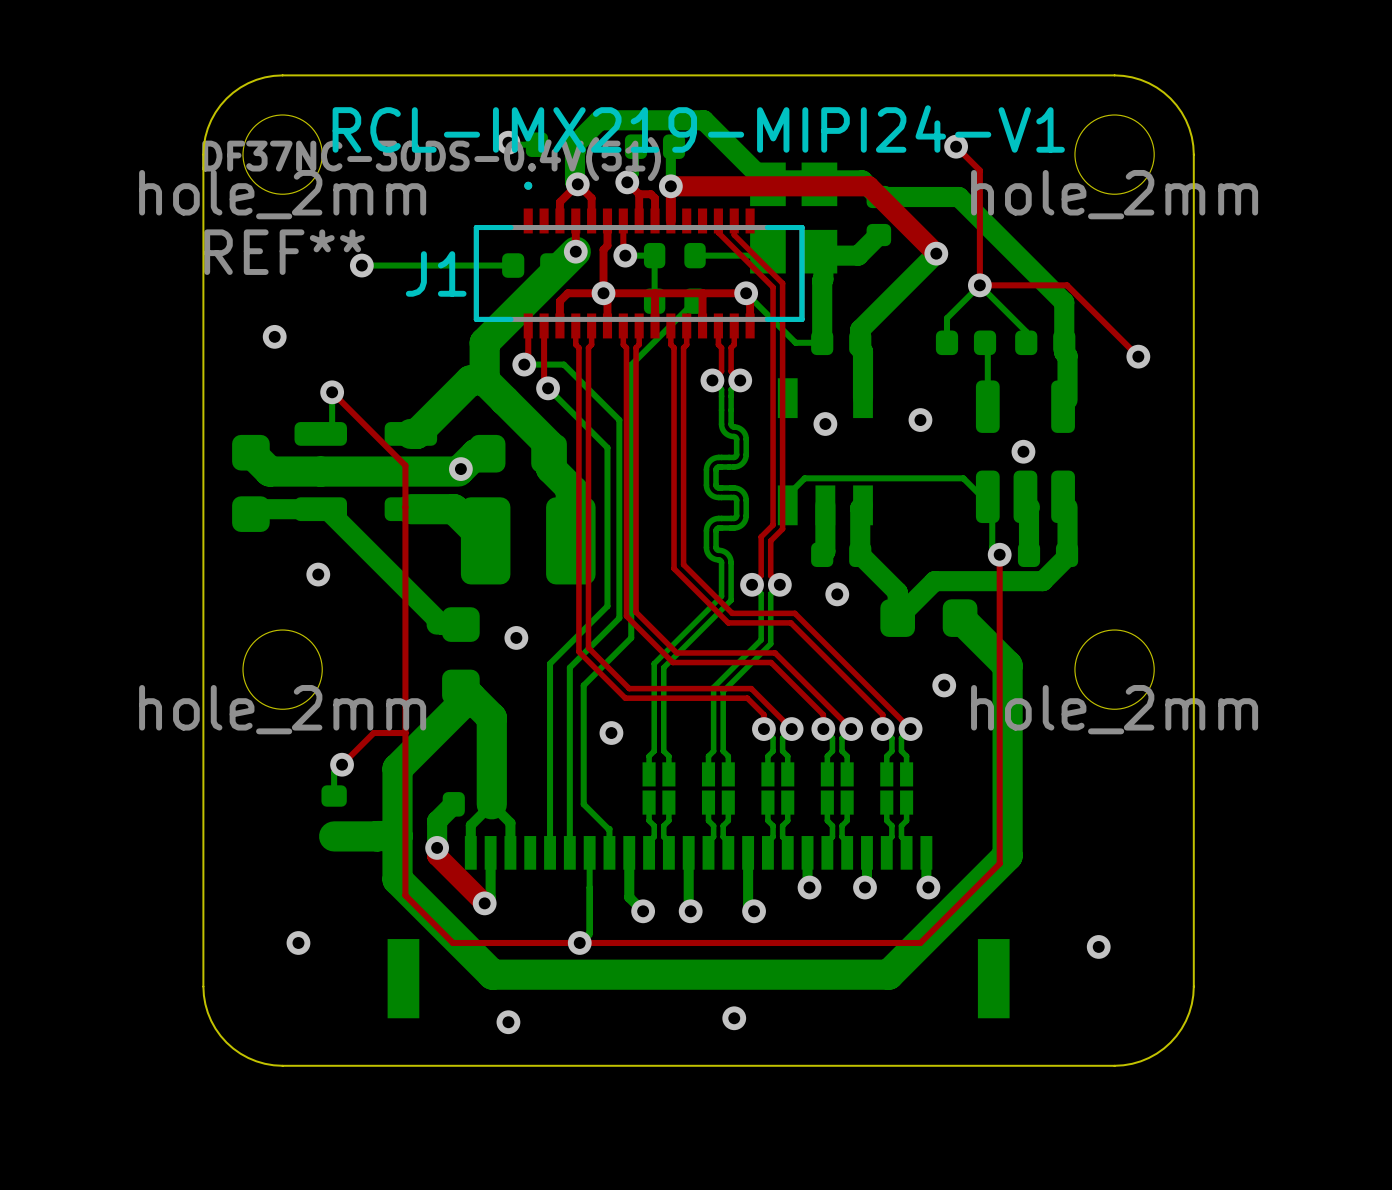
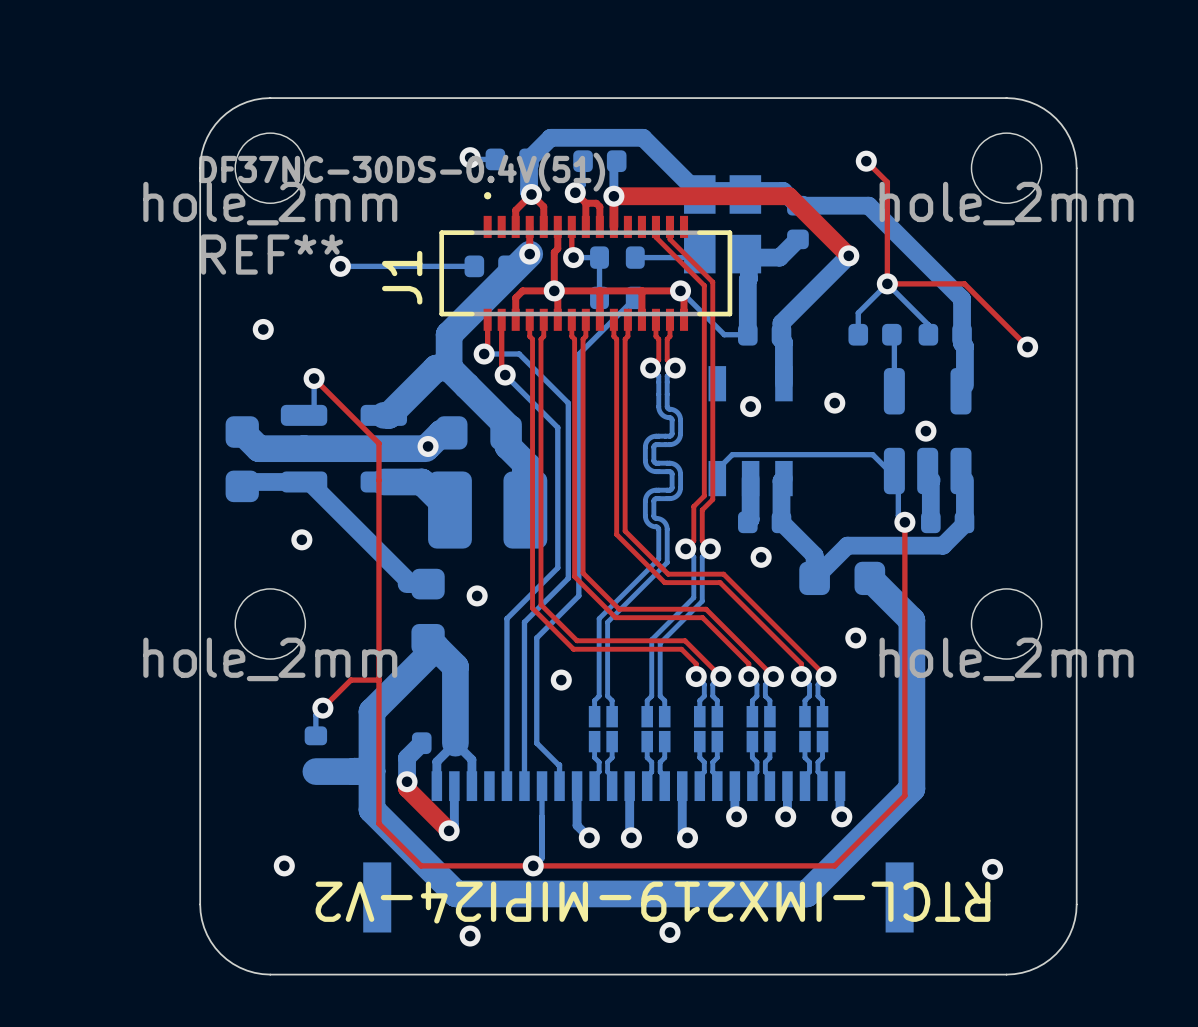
text: RCL-IMX219-MIPI24-V1 (698, 129) -> none
J1 name rotation: 0° (436, 273) -> 90° counterclockwise (402, 277)
text: none -> RTCL-IMX219-MIPI24-V2 (653, 902)

